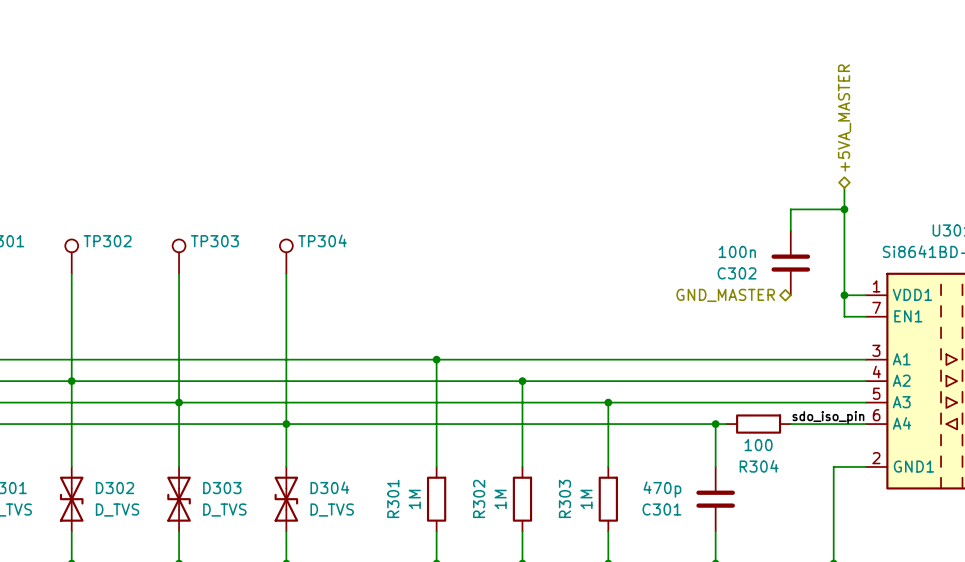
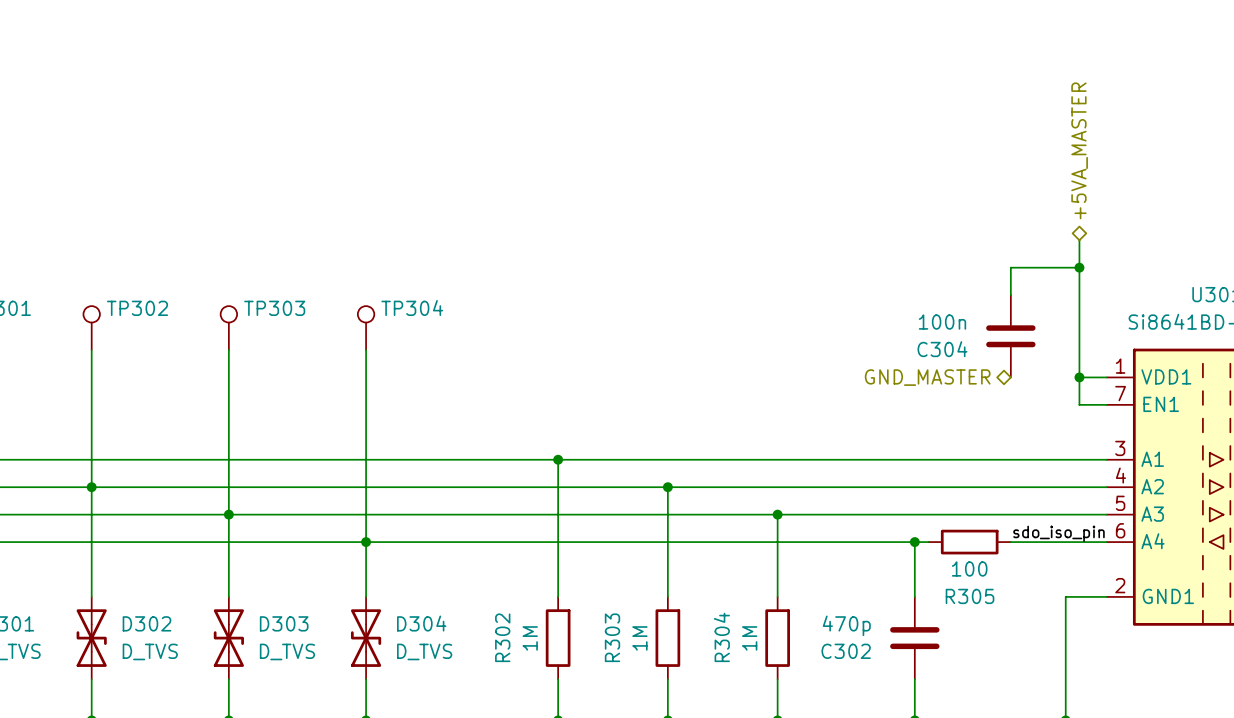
C302 name: C302 (737, 273) -> C304 (942, 349)
R304 name: R304 (759, 466) -> R305 (970, 596)
R301 name: R301 (393, 498) -> R302 (502, 637)
R302 name: R302 (479, 498) -> R303 (612, 637)
R303 name: R303 (565, 498) -> R304 (721, 637)
C301 name: C301 (661, 509) -> C302 (846, 651)

